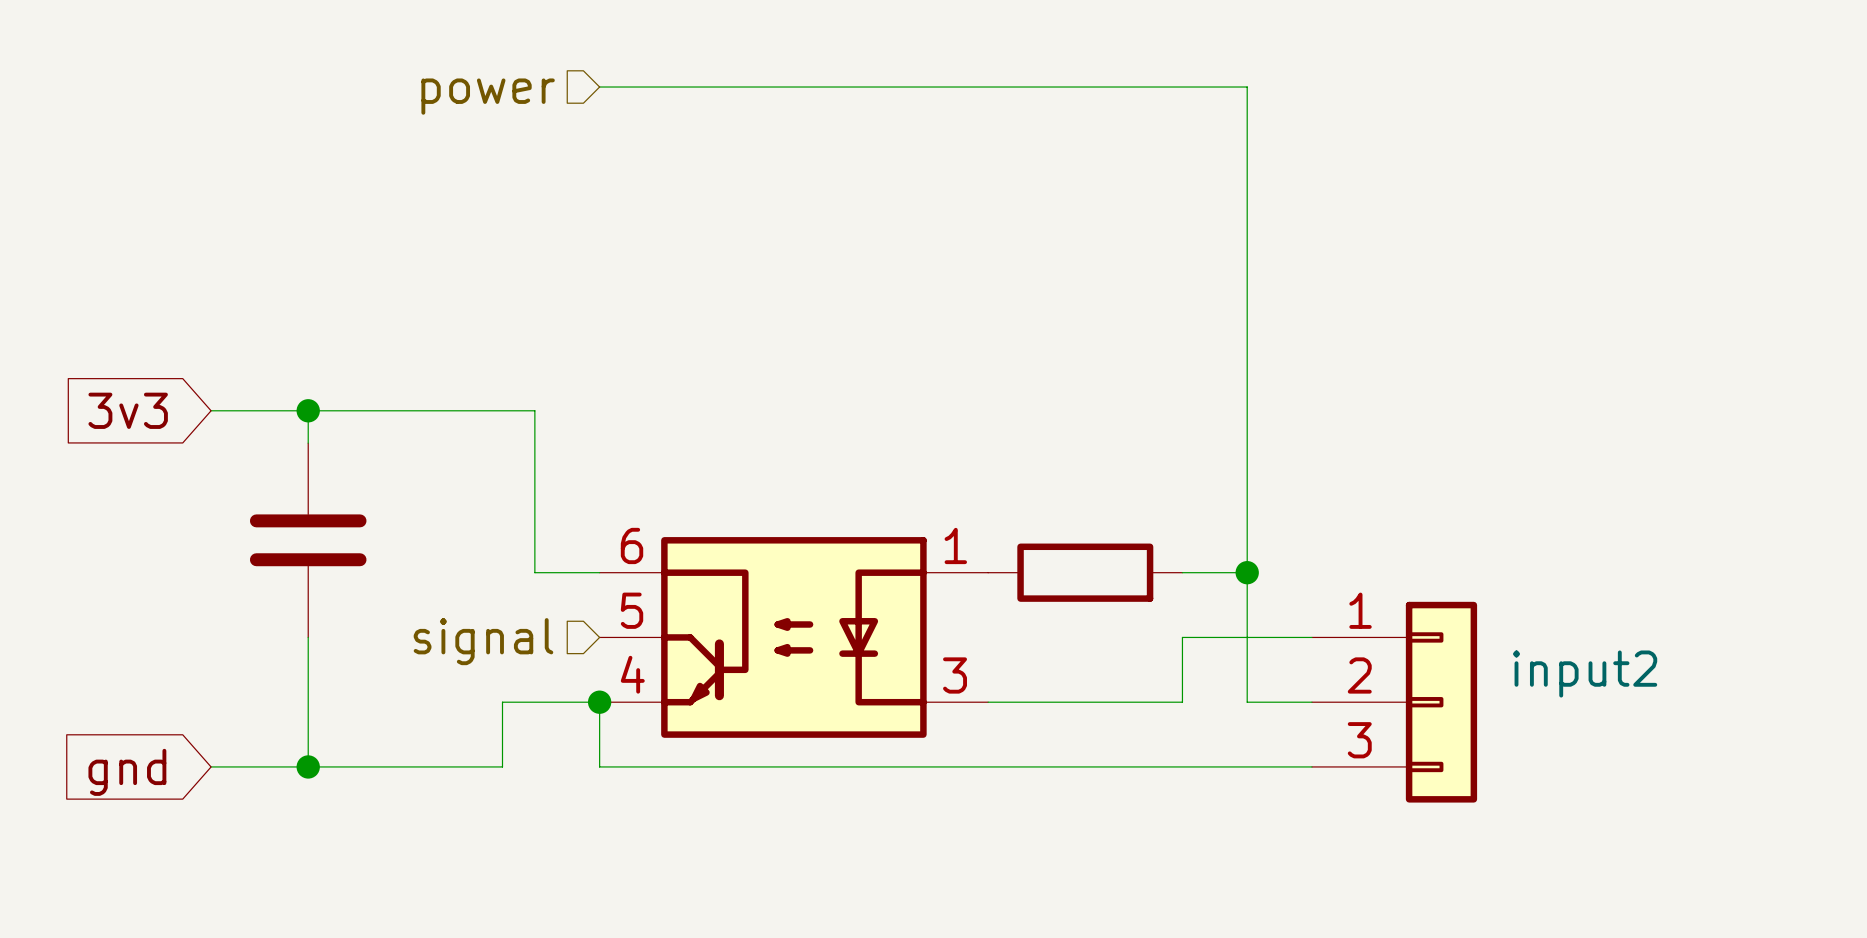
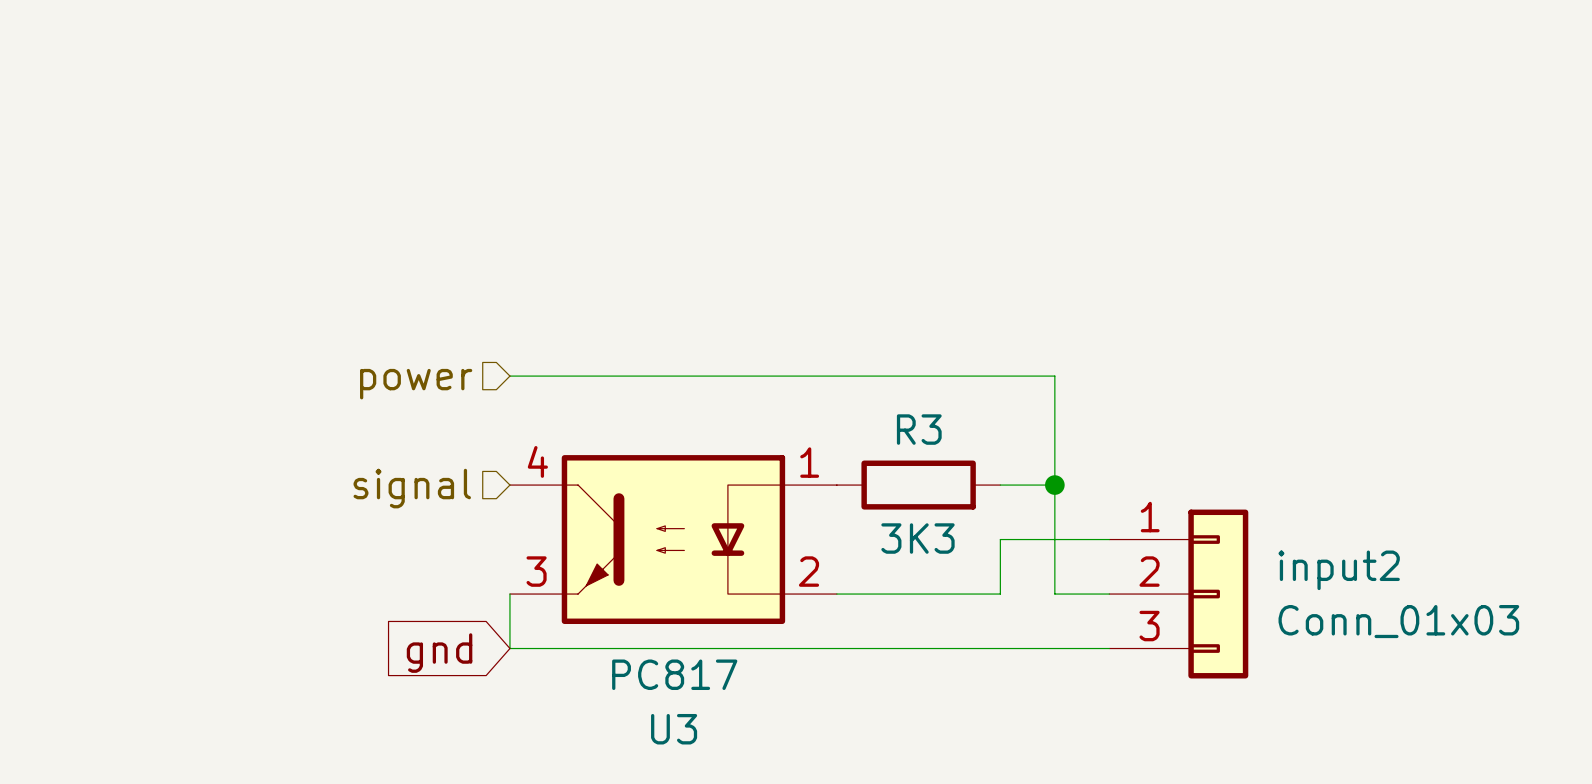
wire: (599, 87) (1247, 87) (1247, 443) -> (509, 376) (1054, 376)
hierarchical label position: power (488, 96) -> power (416, 384)
global label: 3v3 (128, 410) -> none
wire: (211, 410) (534, 410) (534, 572) (599, 572) -> none
wire: (308, 410) (308, 443) -> none
junction: (308, 410) -> none
R3 name: none -> R3 (919, 429)
part: (308, 540) -> none
R3 value: none -> 3K3 (917, 538)
wire: (308, 637) (308, 766) -> none
part: (793, 637) -> none
U3: none -> PC817 (673, 539)
hierarchical label position: signal (483, 641) -> signal (412, 488)
wire: (599, 702) (502, 702) (502, 766) (211, 766) -> none
junction: (599, 702) -> none
input2 value: none -> Conn_01x03 (1398, 621)
junction: (308, 766) -> none
global label position: gnd (127, 772) -> gnd (439, 653)

